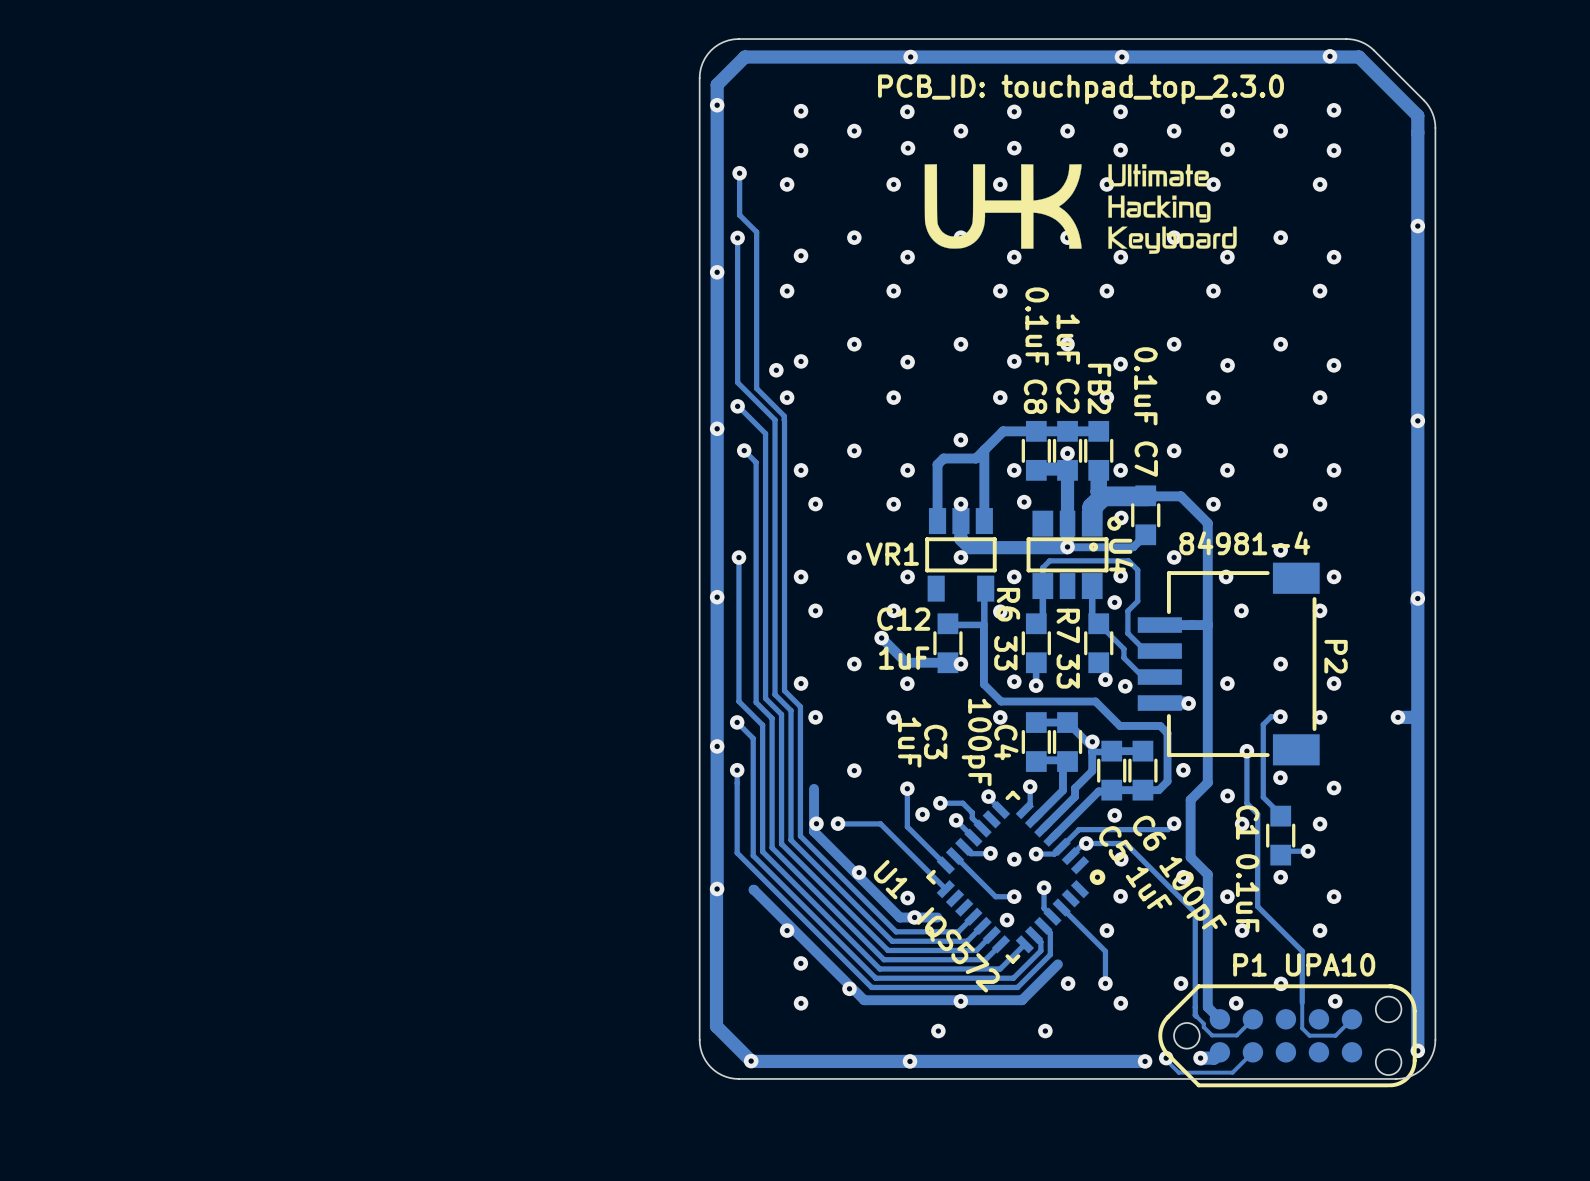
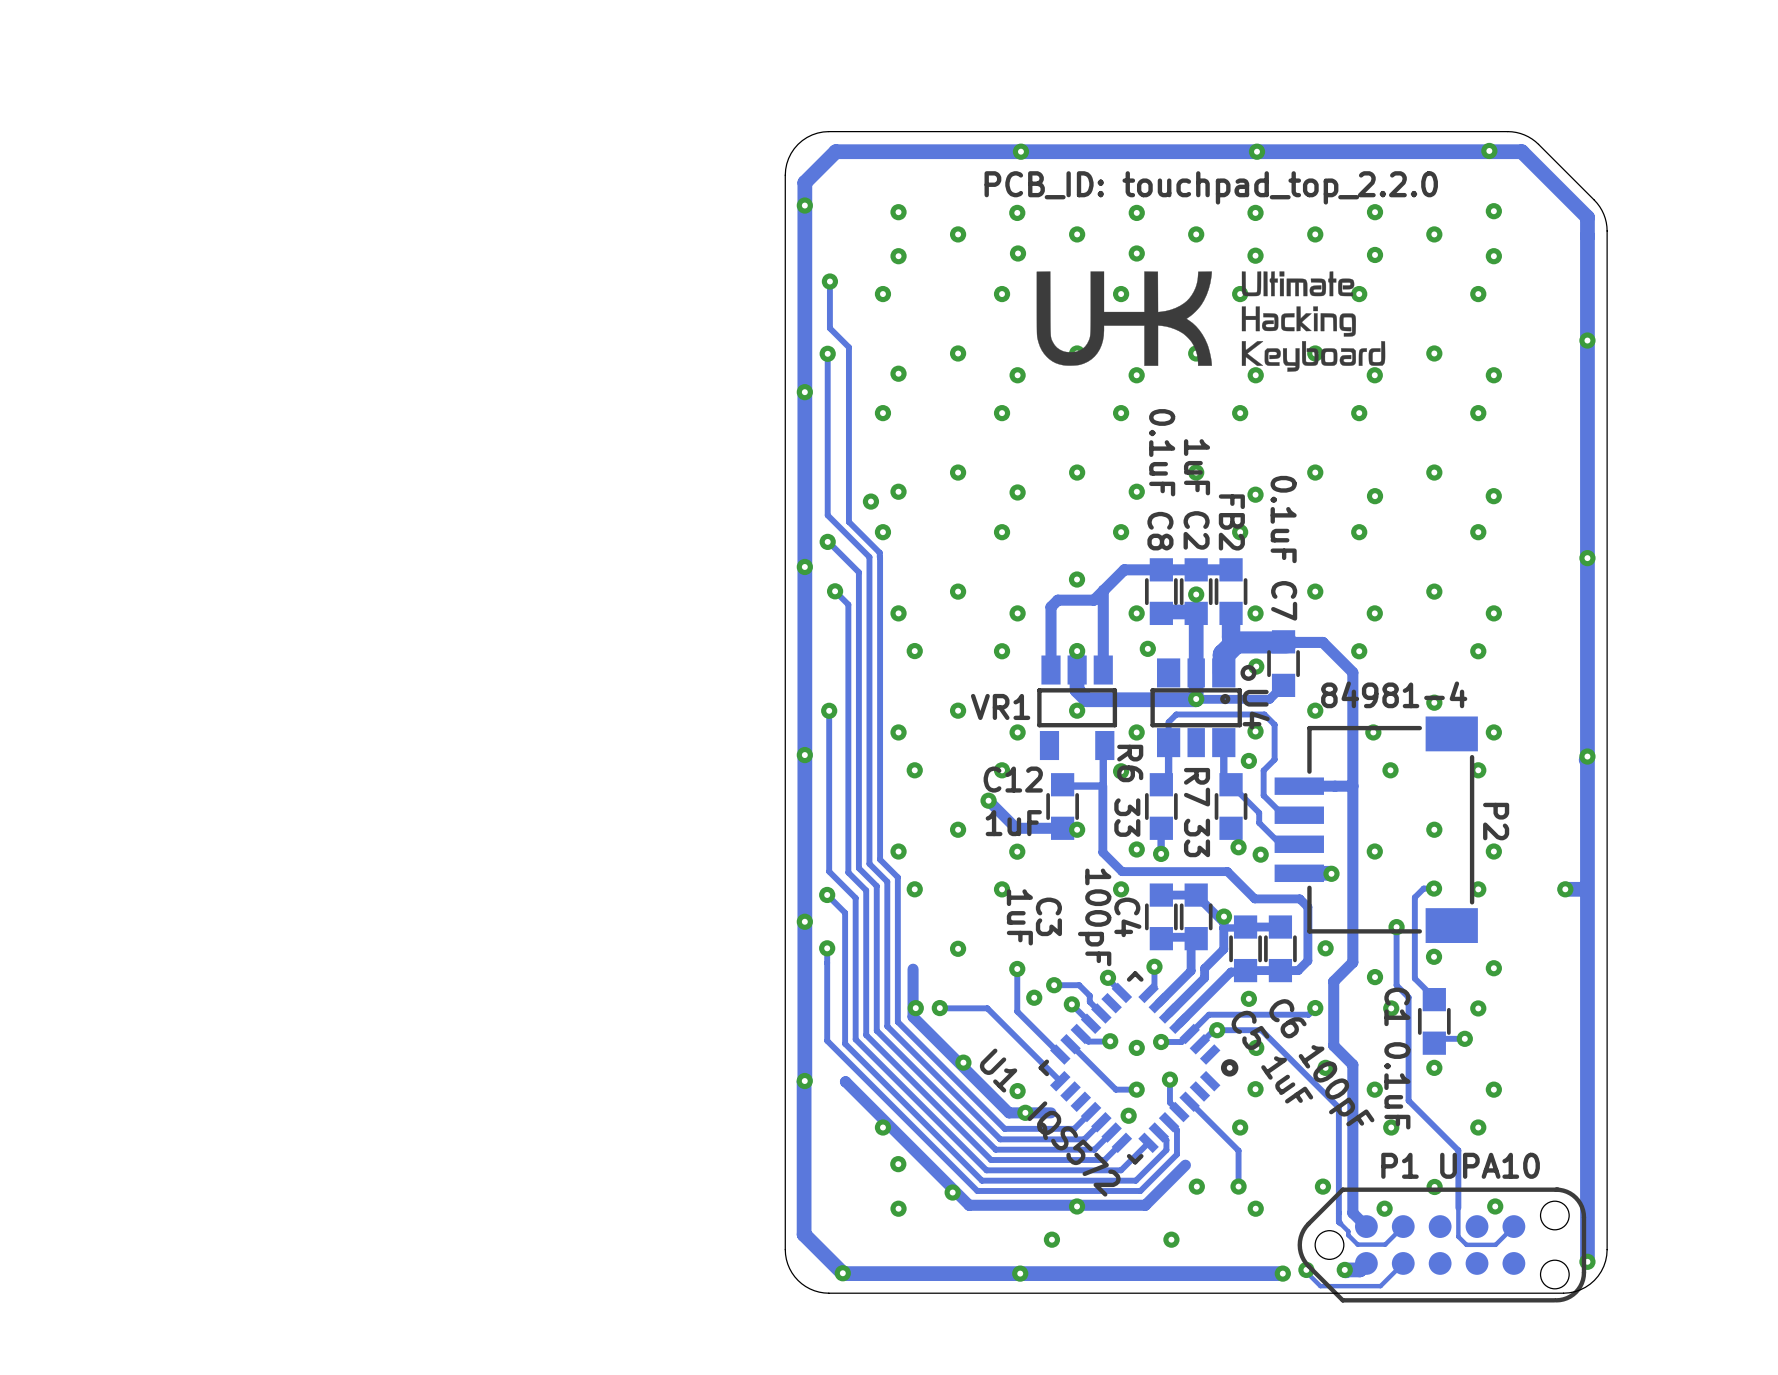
text: PCB_ID: touchpad_top_2.3.0 (1081, 89) -> PCB_ID: touchpad_top_2.2.0 (1211, 187)

